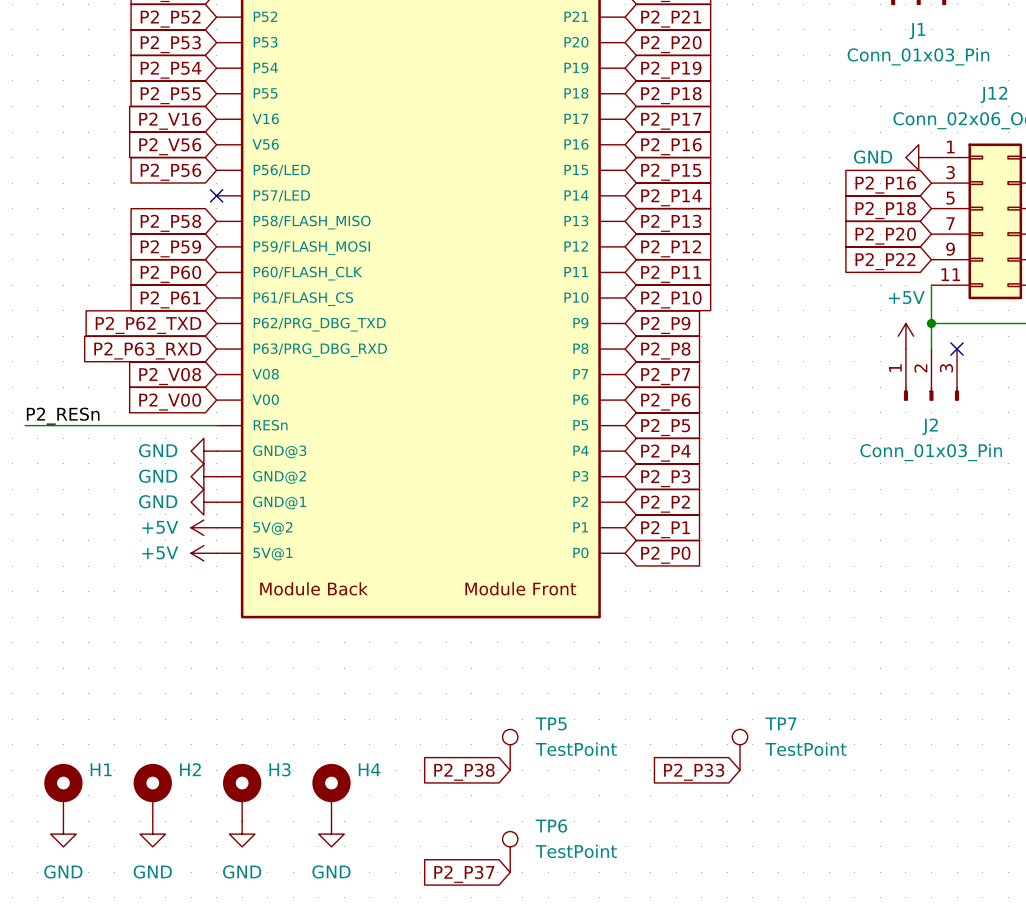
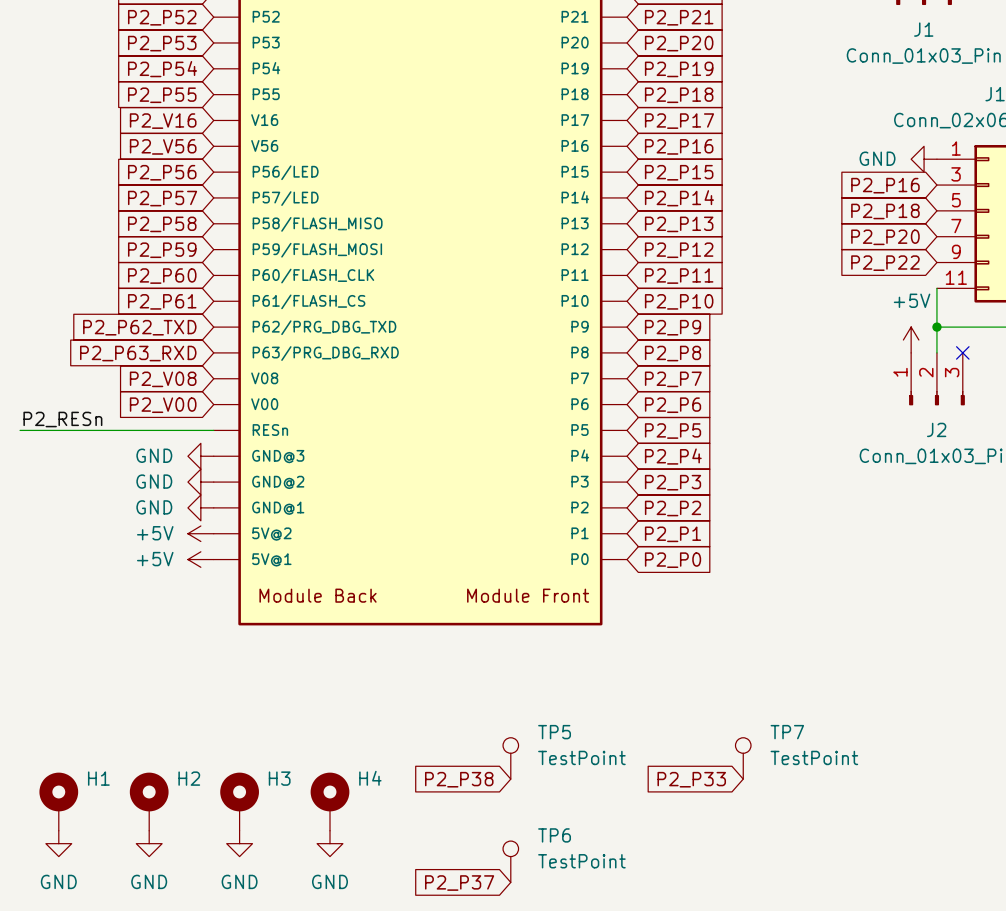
no-connect mark: (216, 195) -> none
global label: none -> P2_P57 (162, 198)

